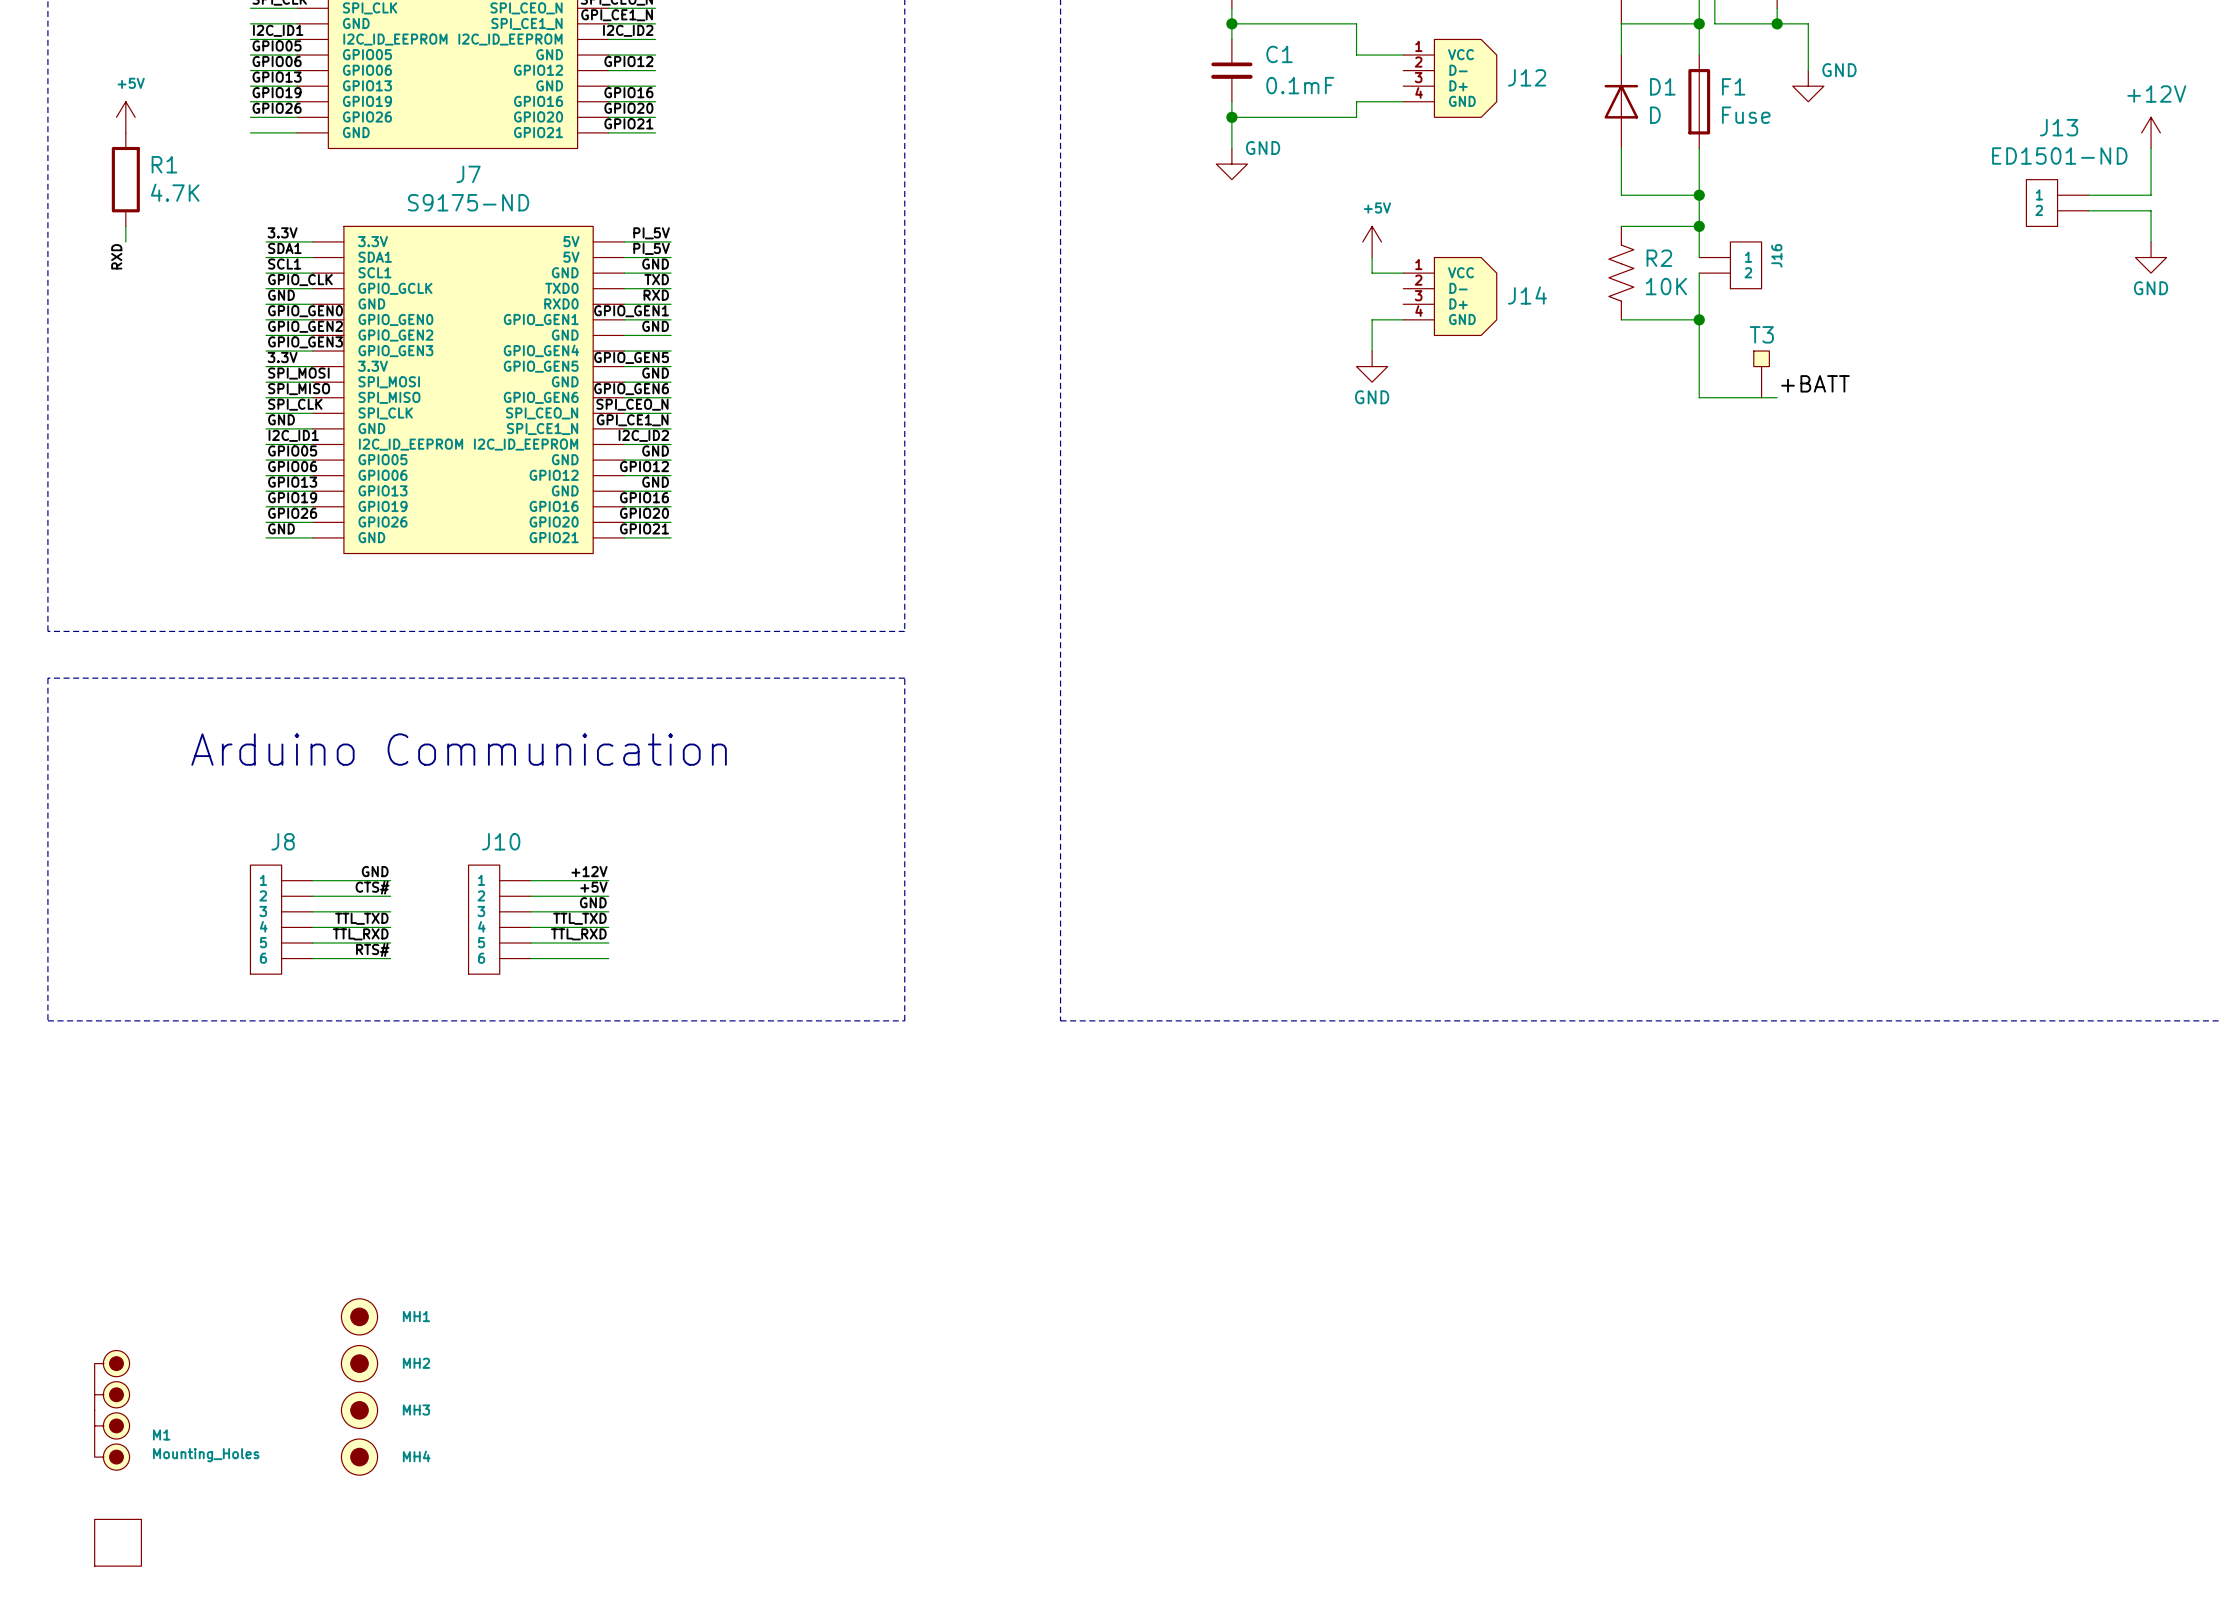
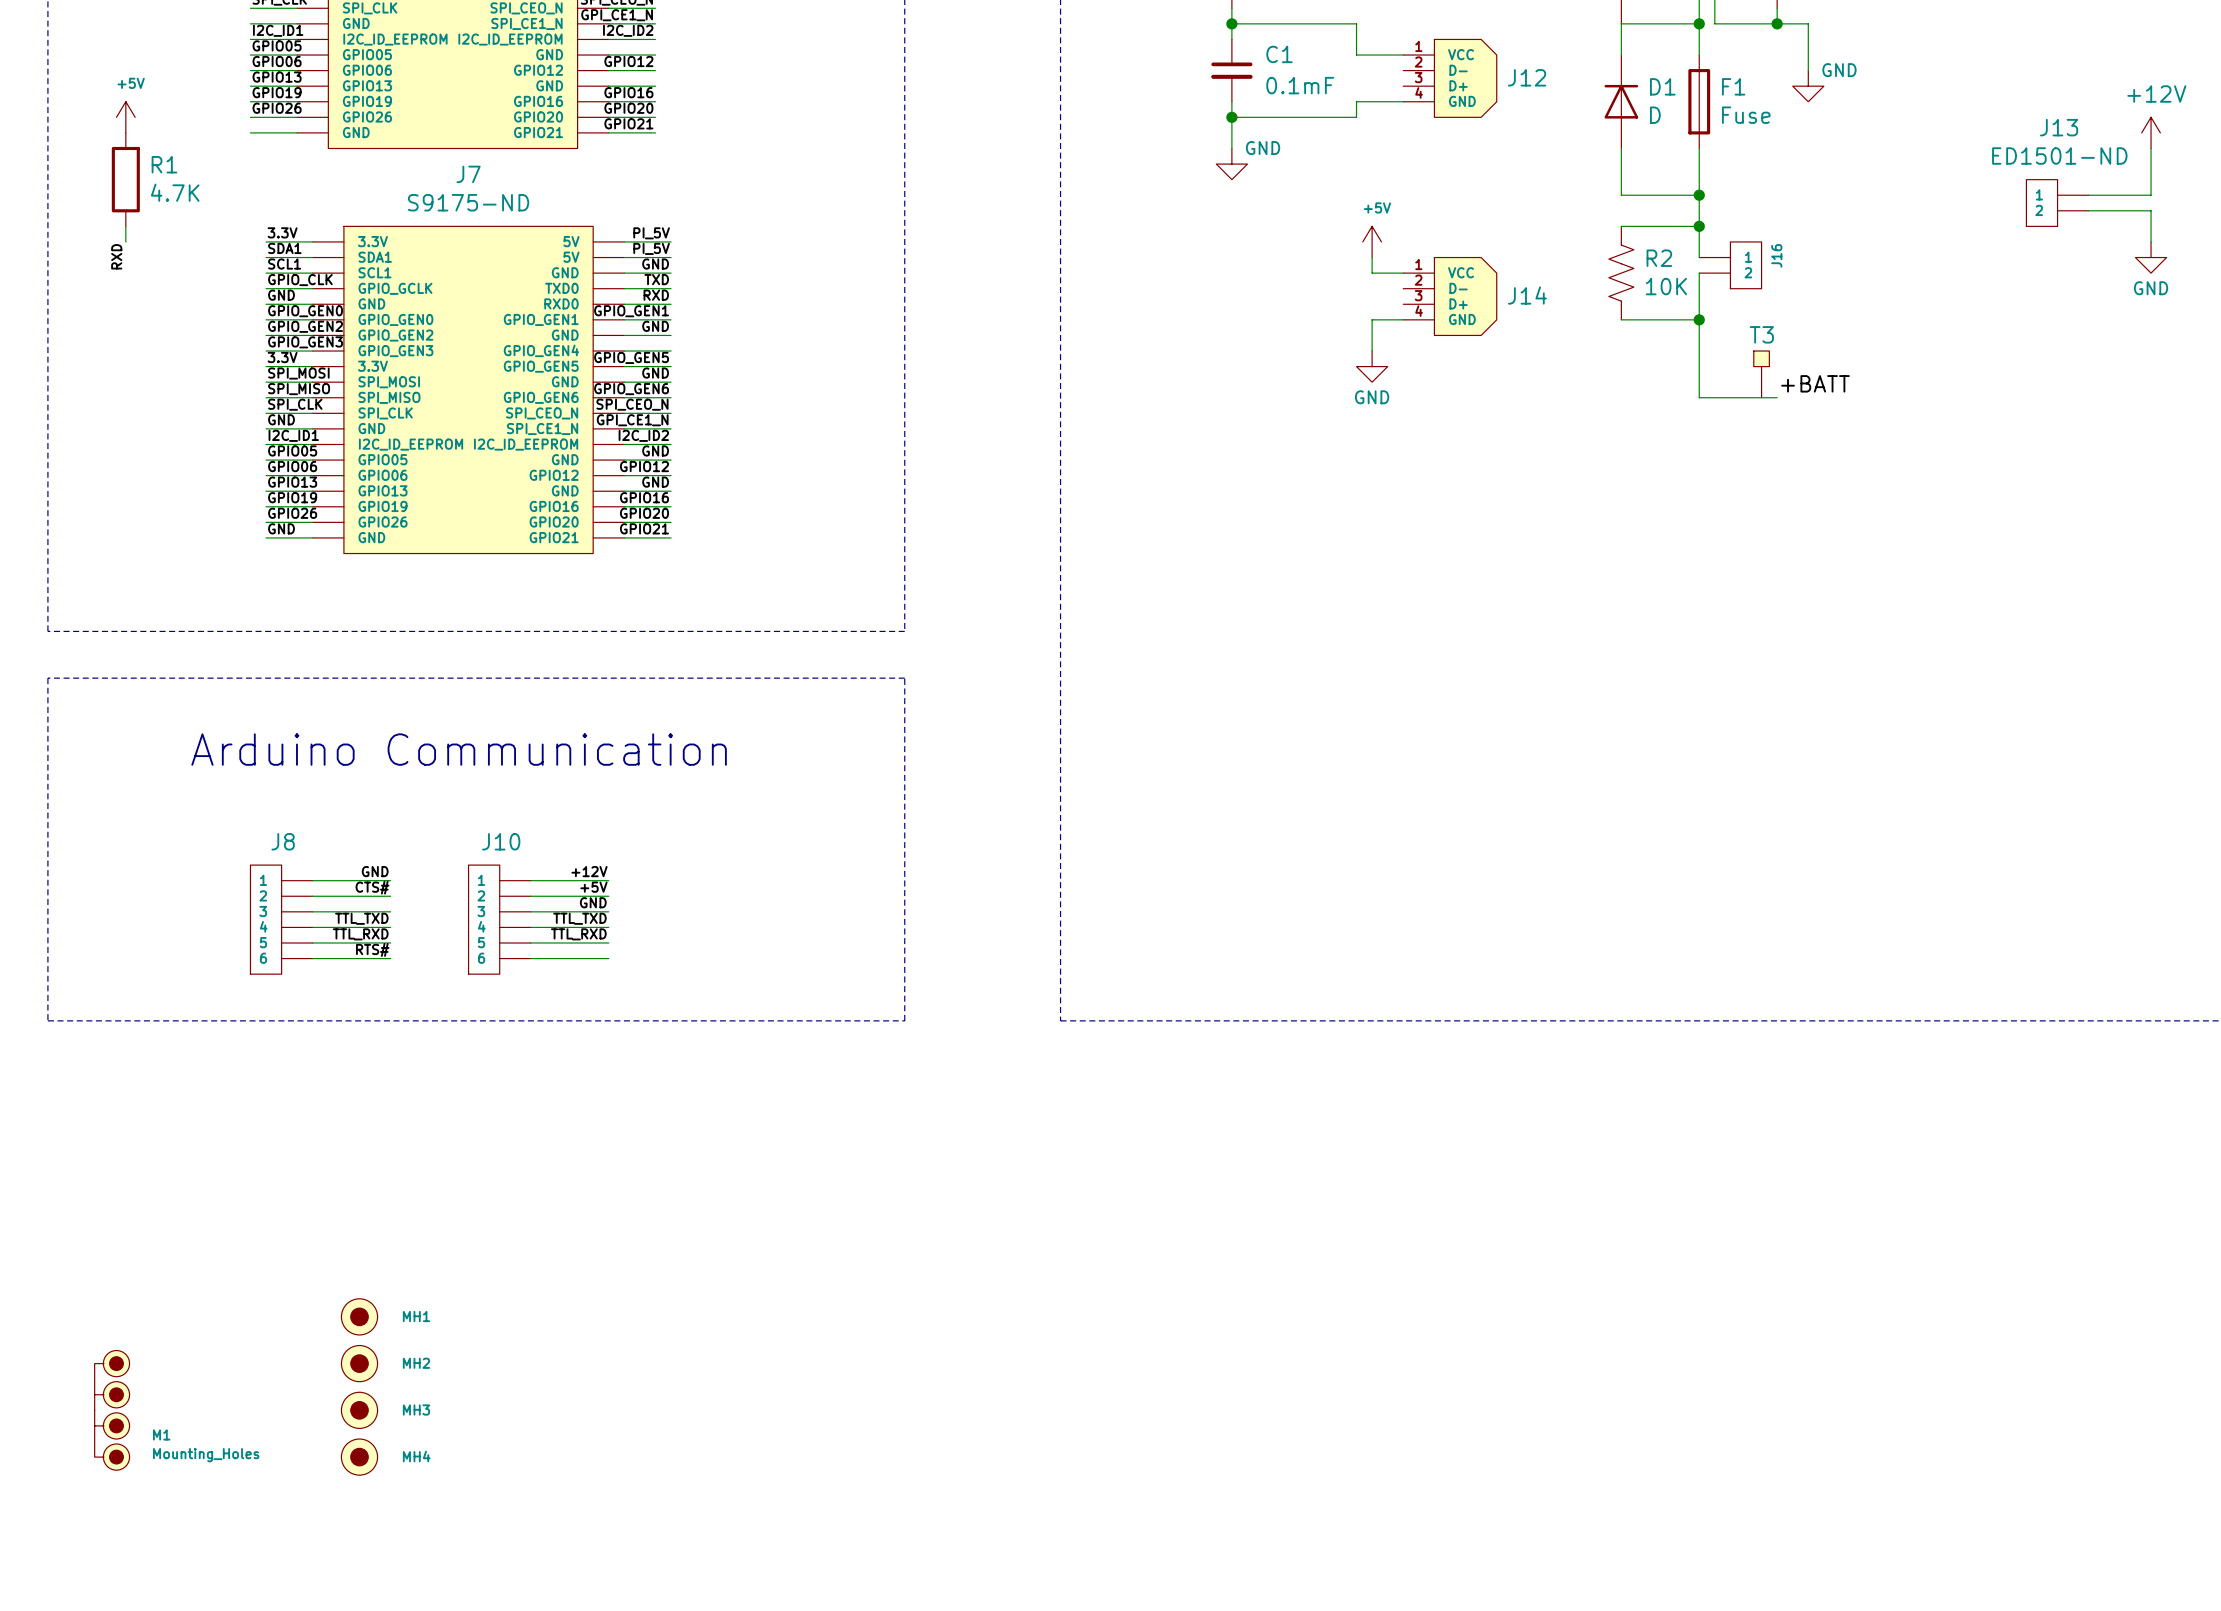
part: (118, 1542) -> none

